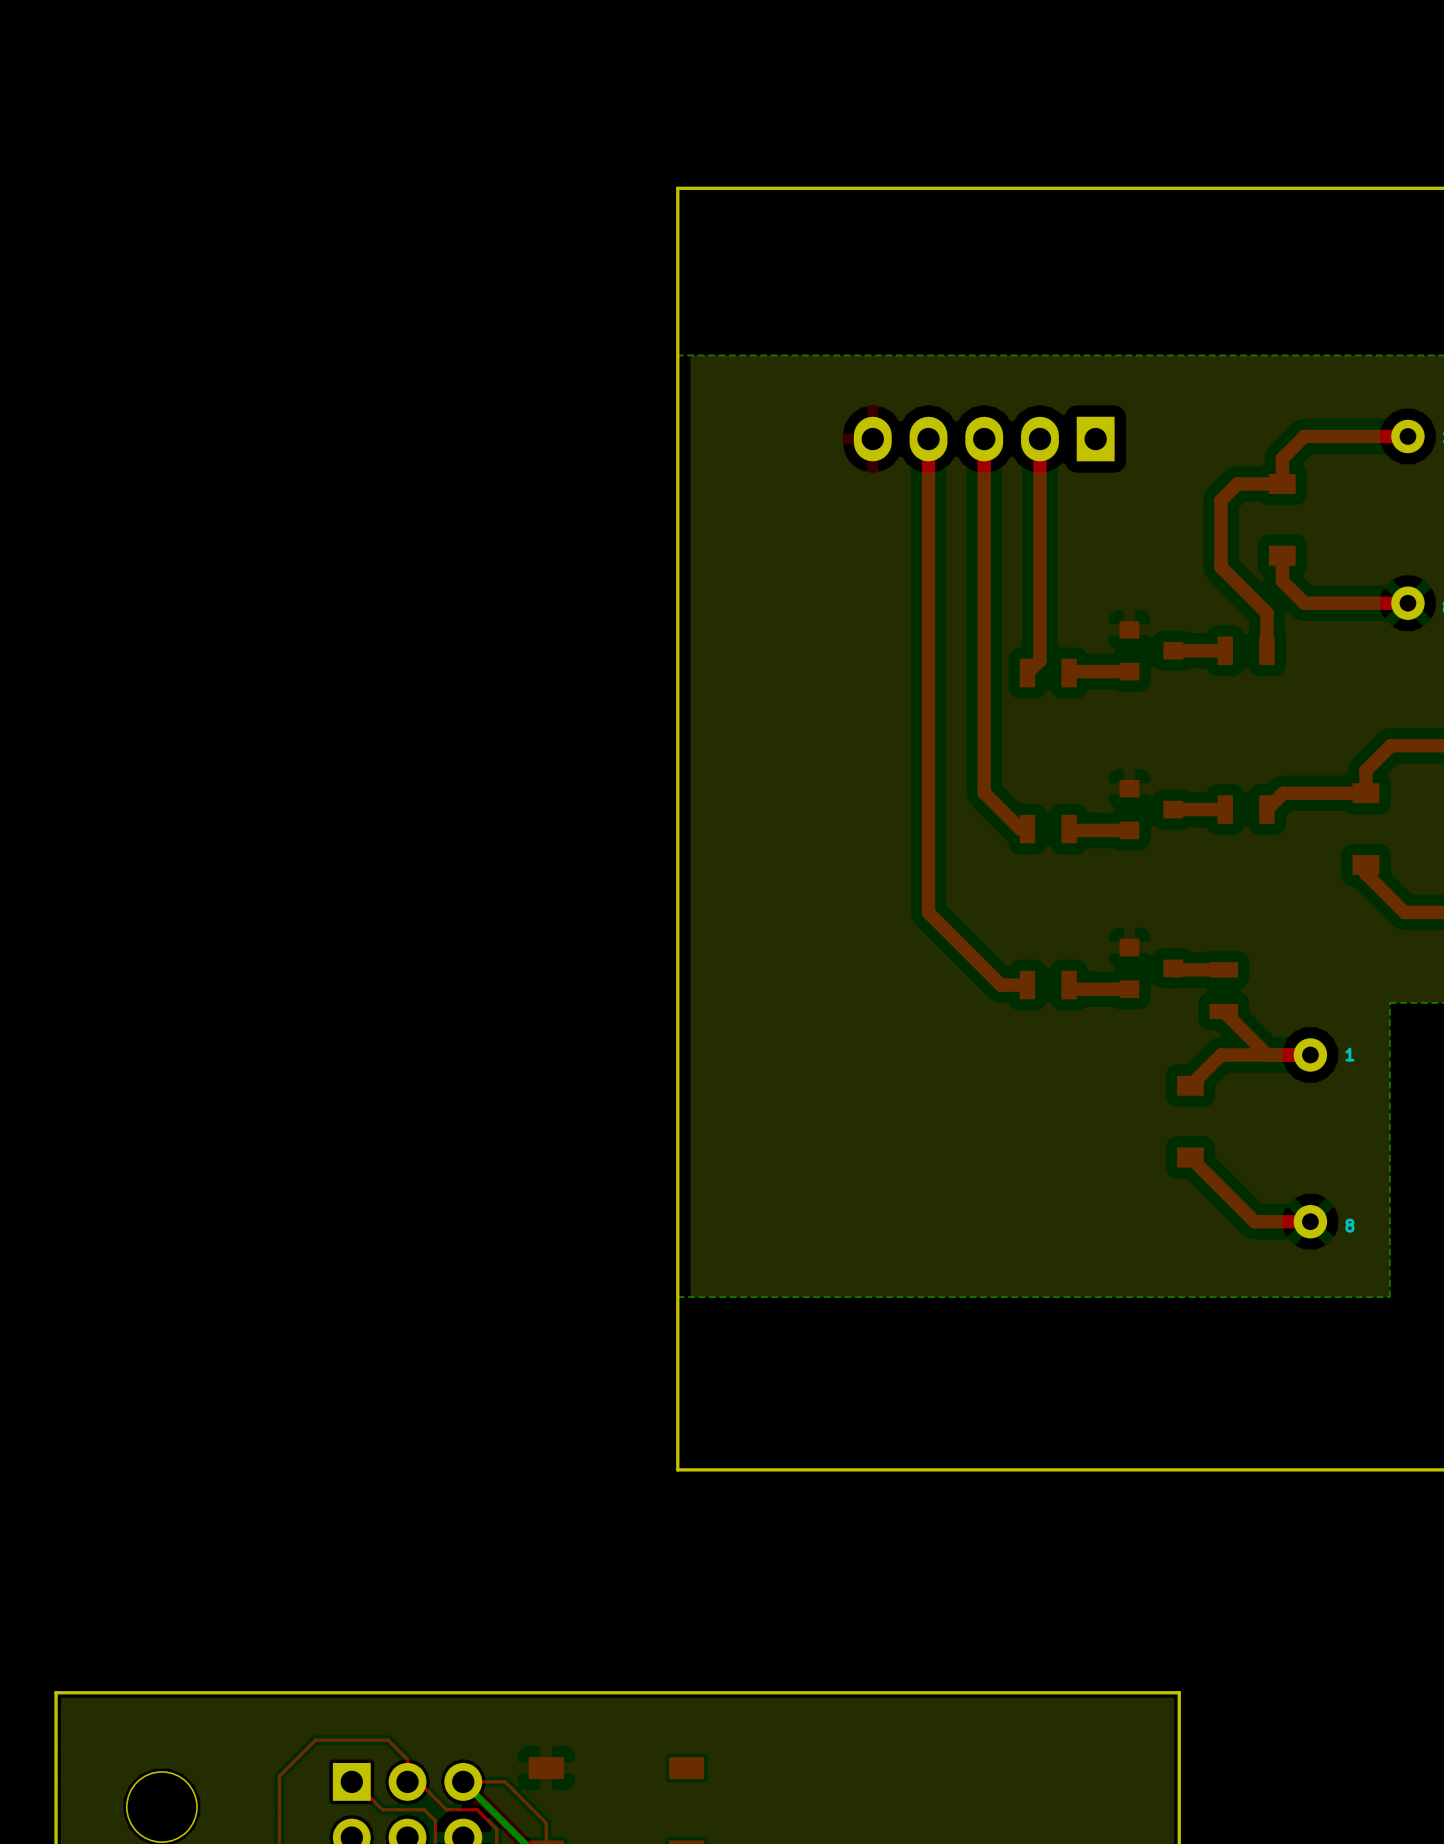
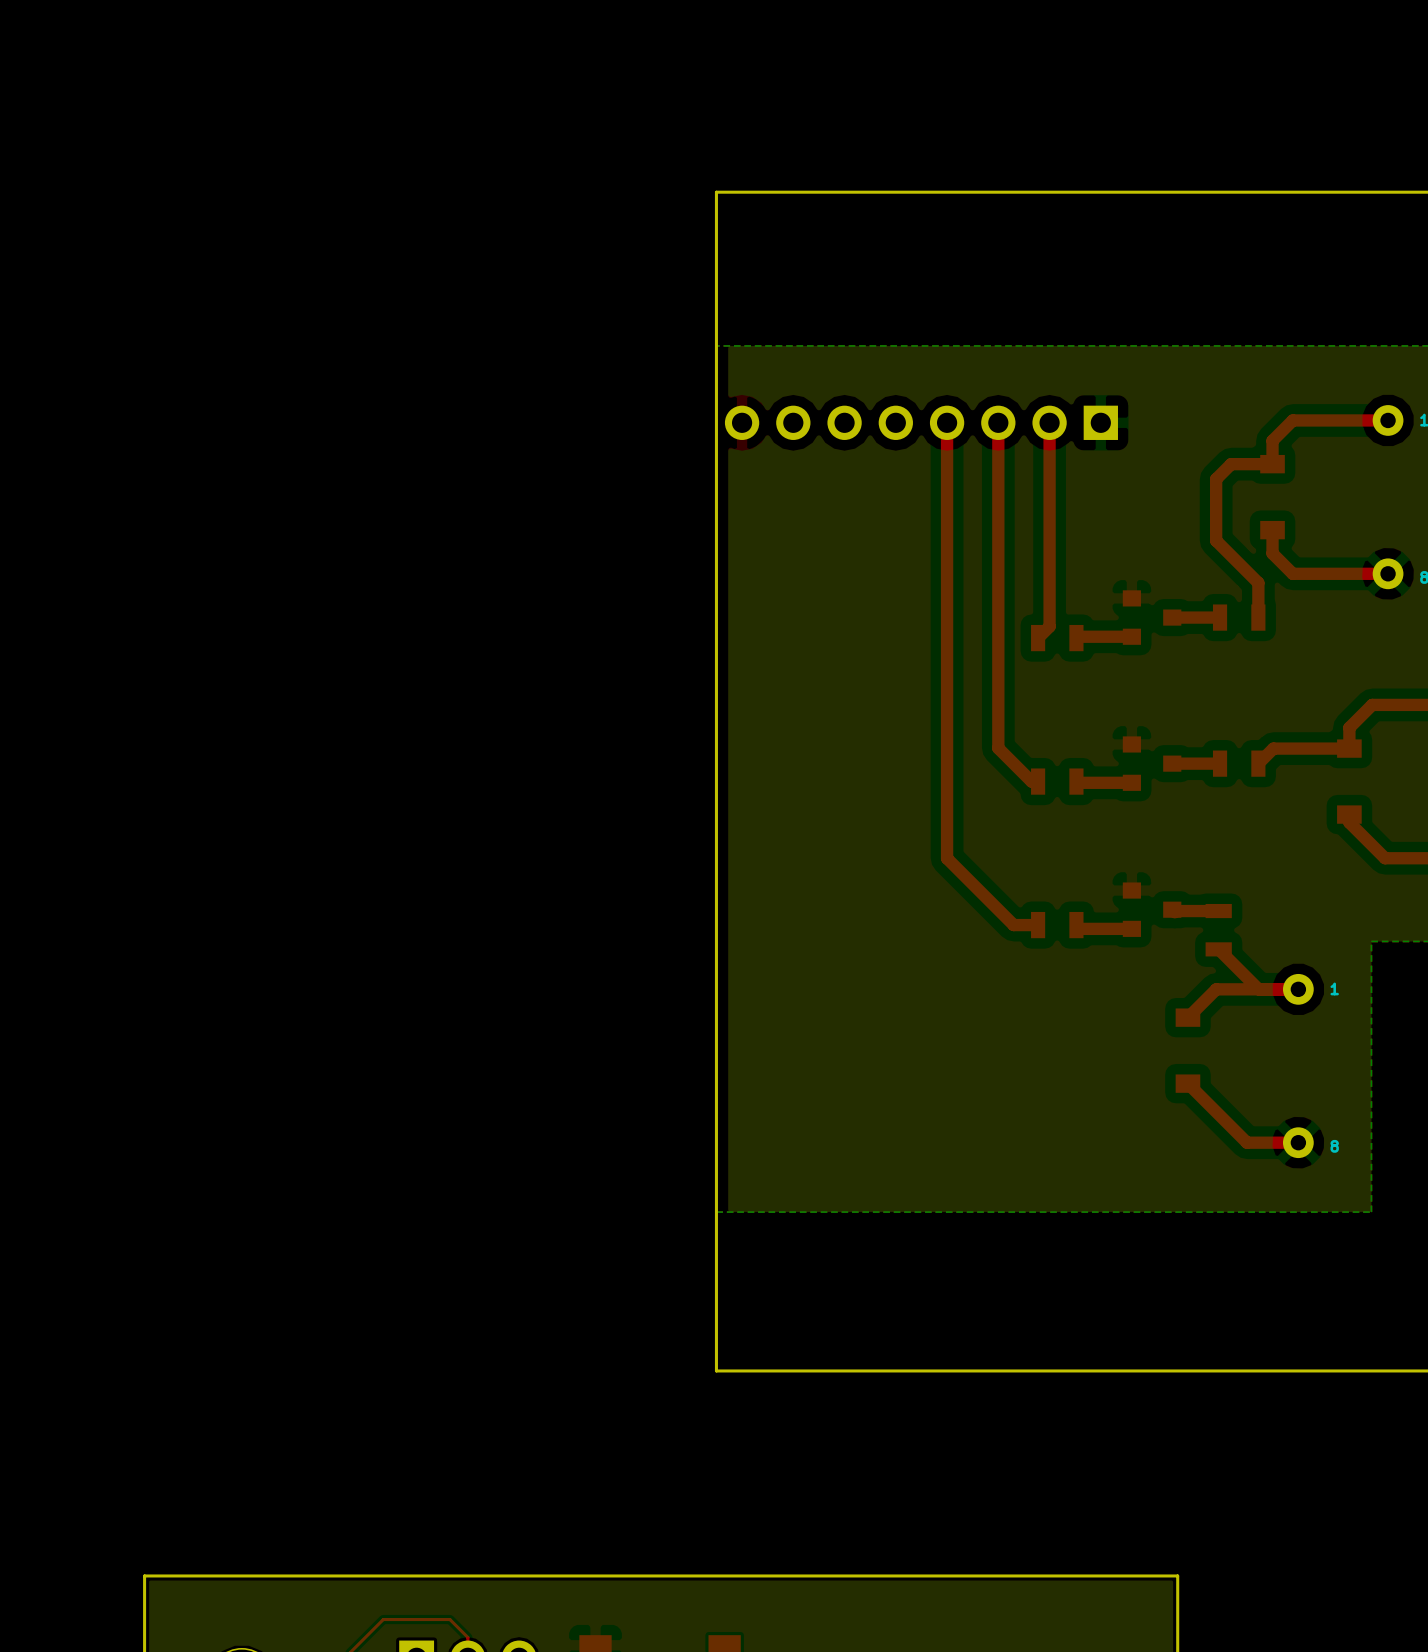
part: none -> (921, 422)
part: (984, 439) -> none

